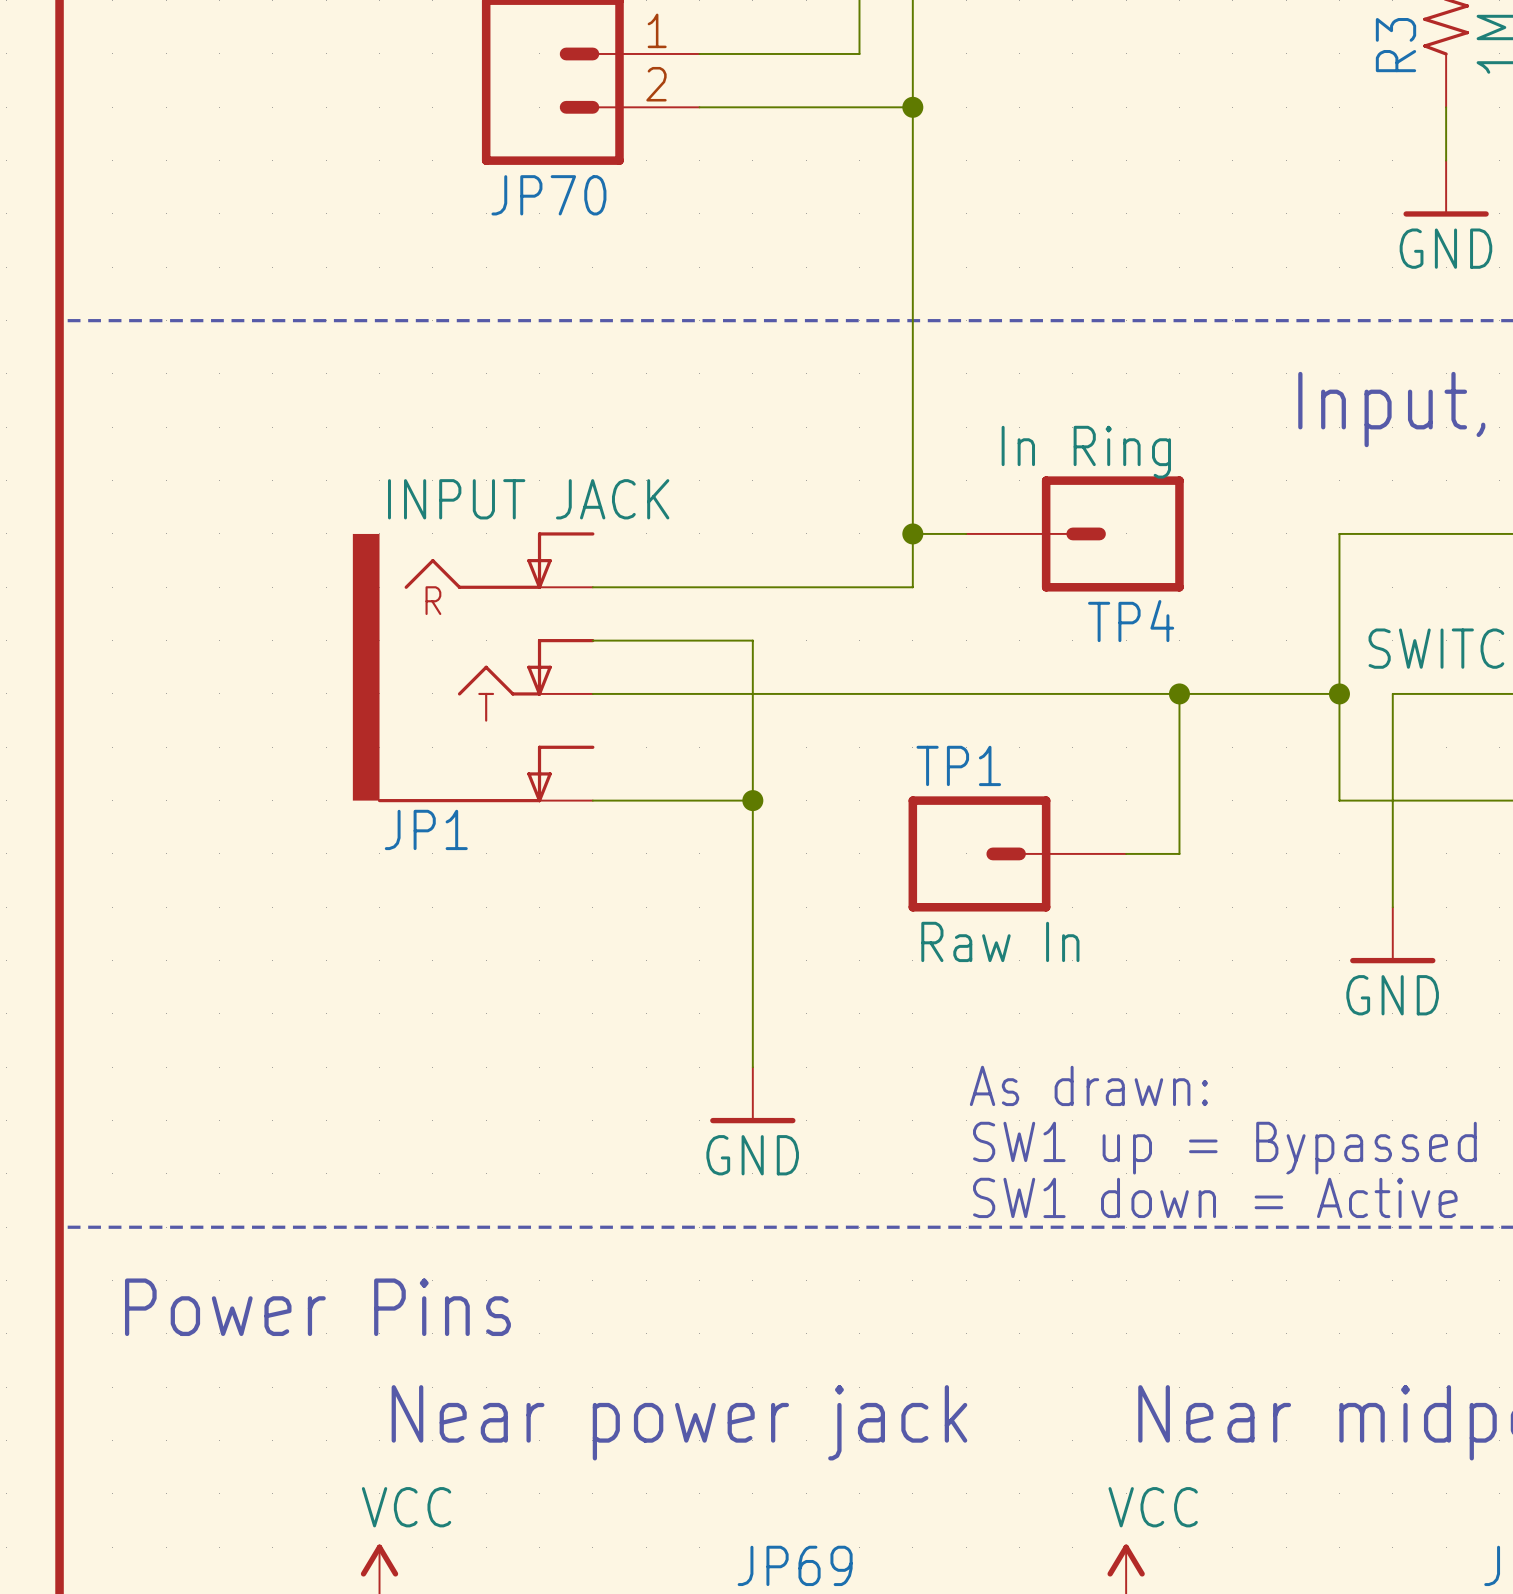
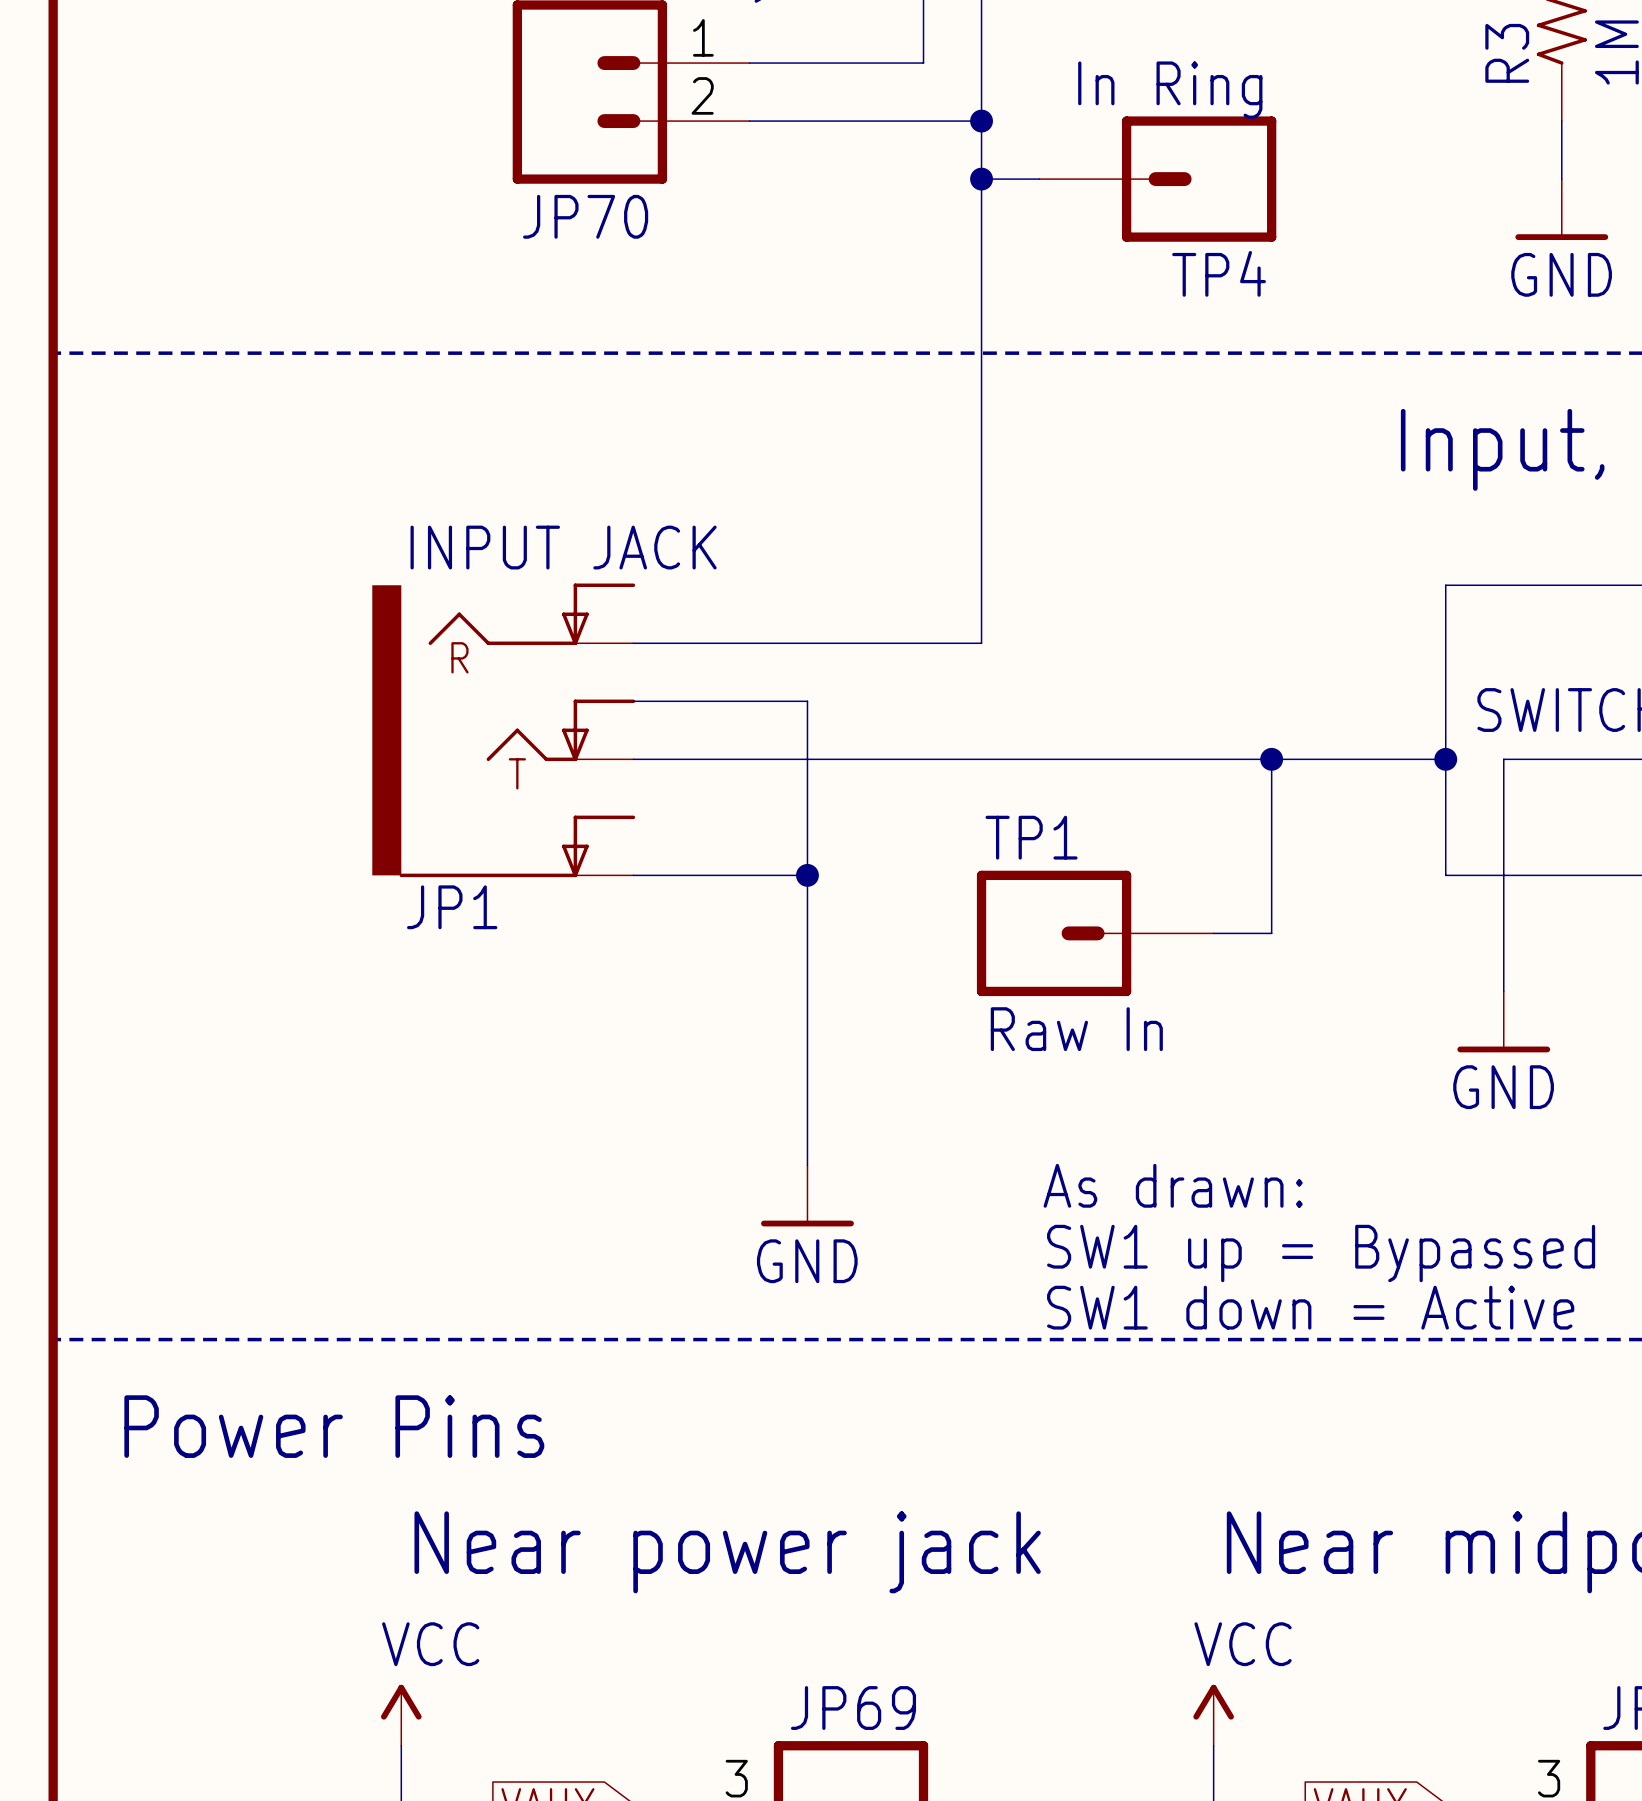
junction: none -> (981, 179)
wire: (912, 533) (966, 533) -> (981, 179) (1039, 179)
junction: (912, 533) -> none
TP4 position: (1074, 533) -> (1157, 179)

